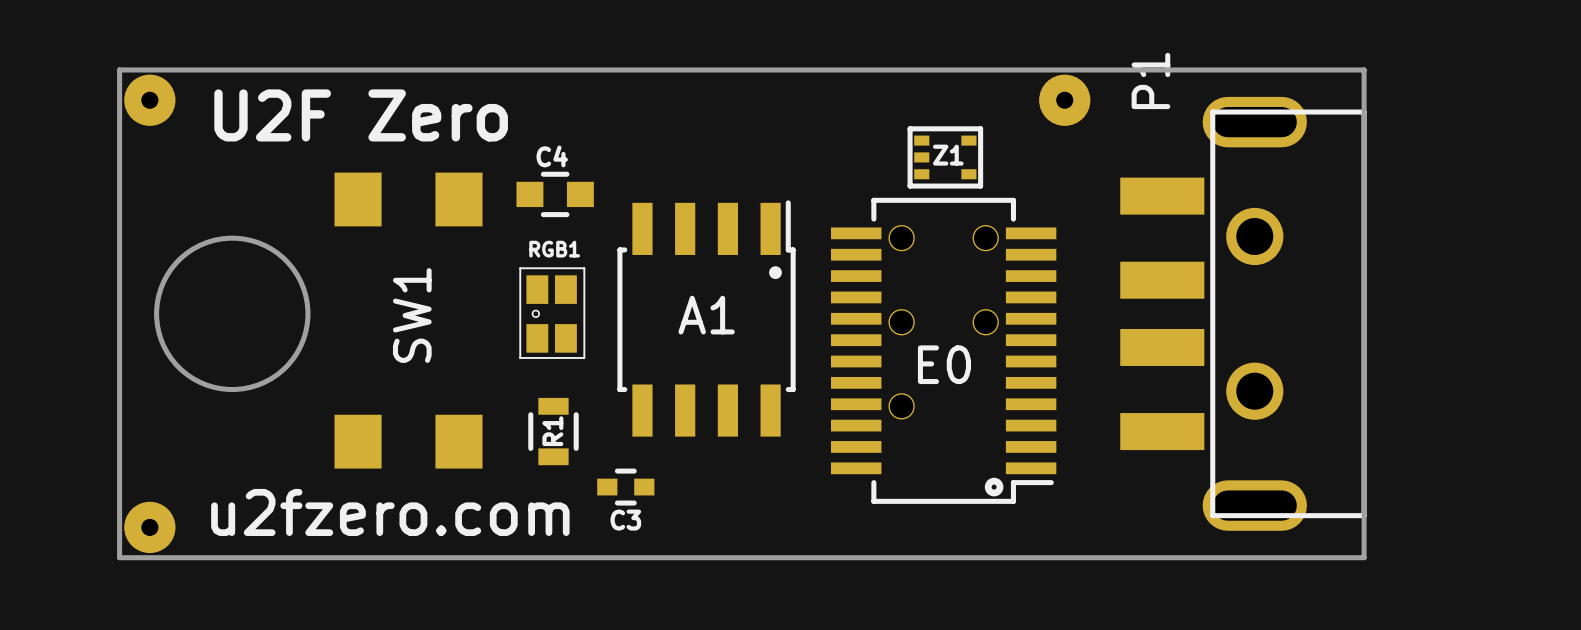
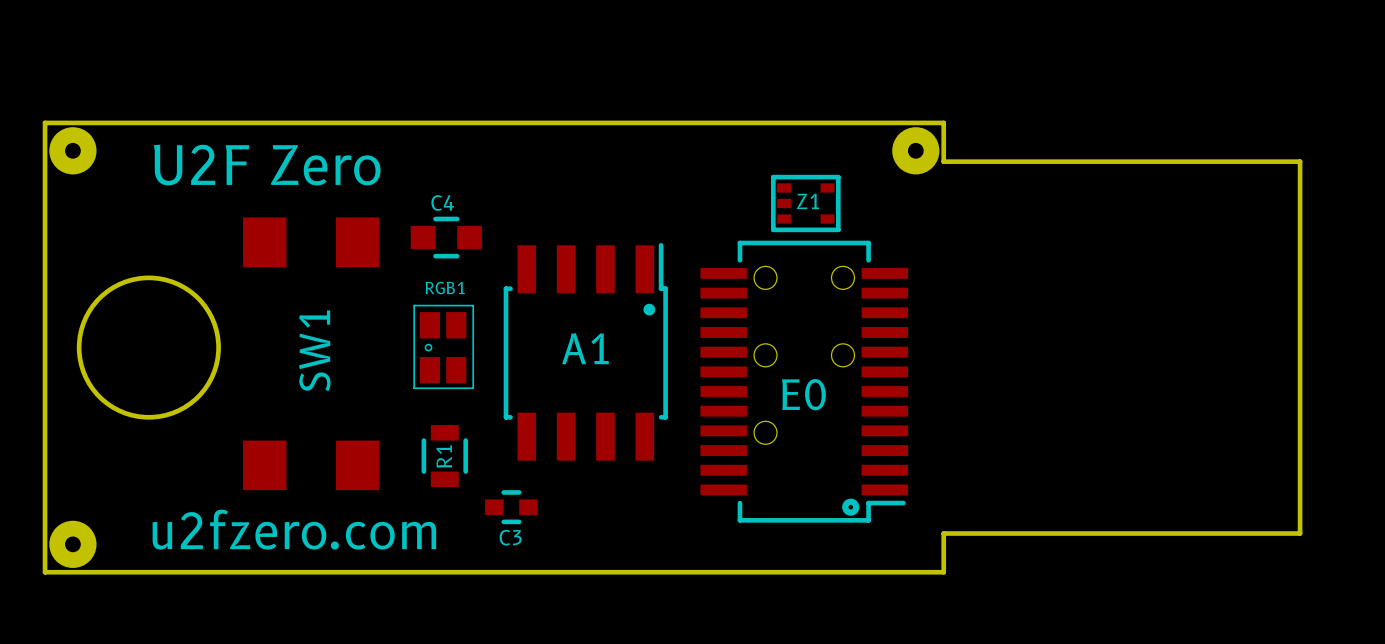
board edge: (1095, 69) (1364, 69) (1364, 557) (1095, 557) -> (943, 122) (943, 161) (1300, 161) (1300, 533) (943, 533) (943, 572)
P1: (1243, 313) -> none

